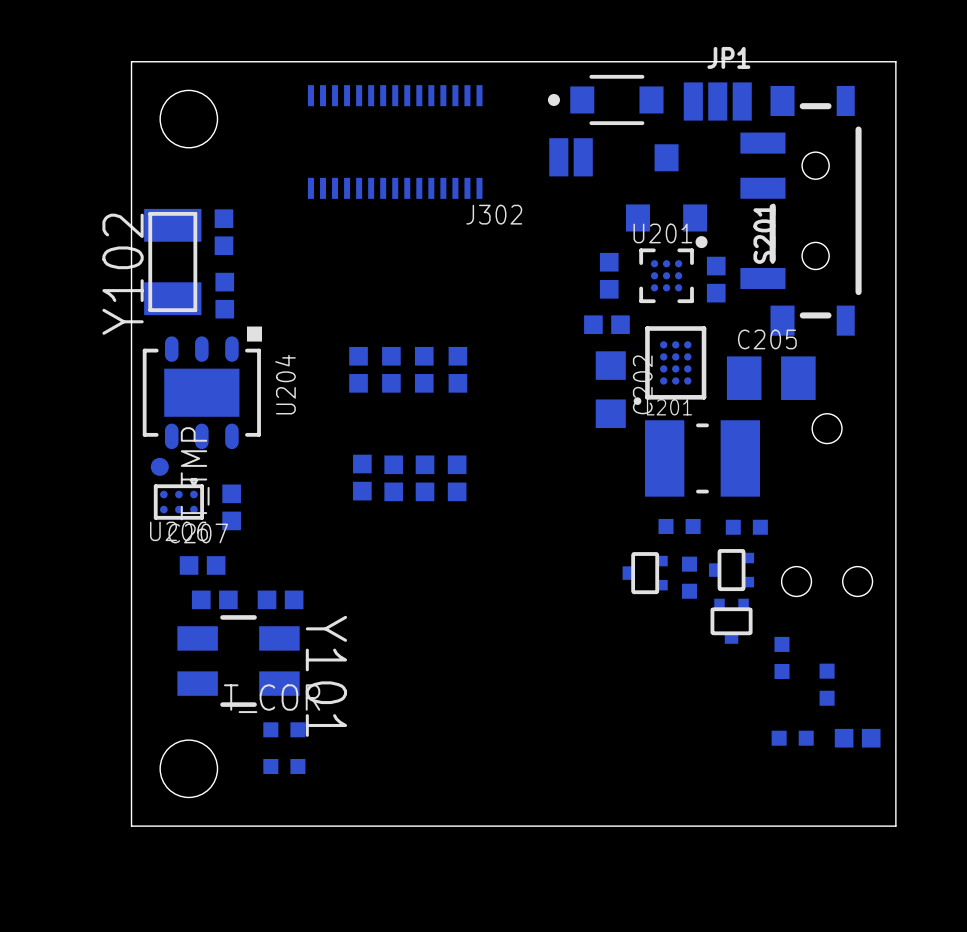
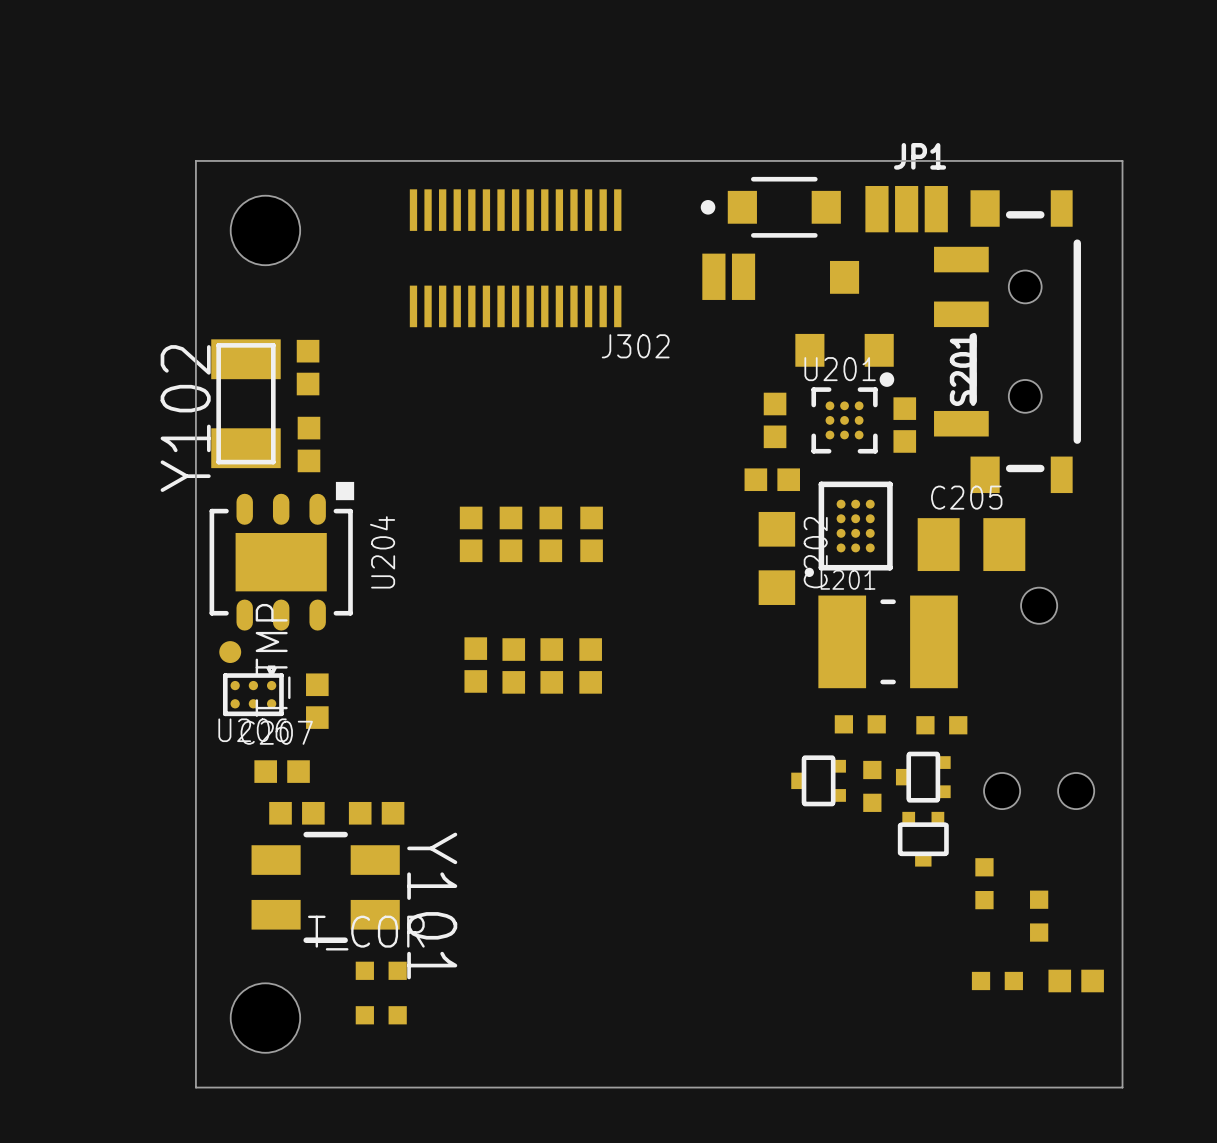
J302 footprint: [307, 85, 483, 199] -> [409, 189, 622, 328]

